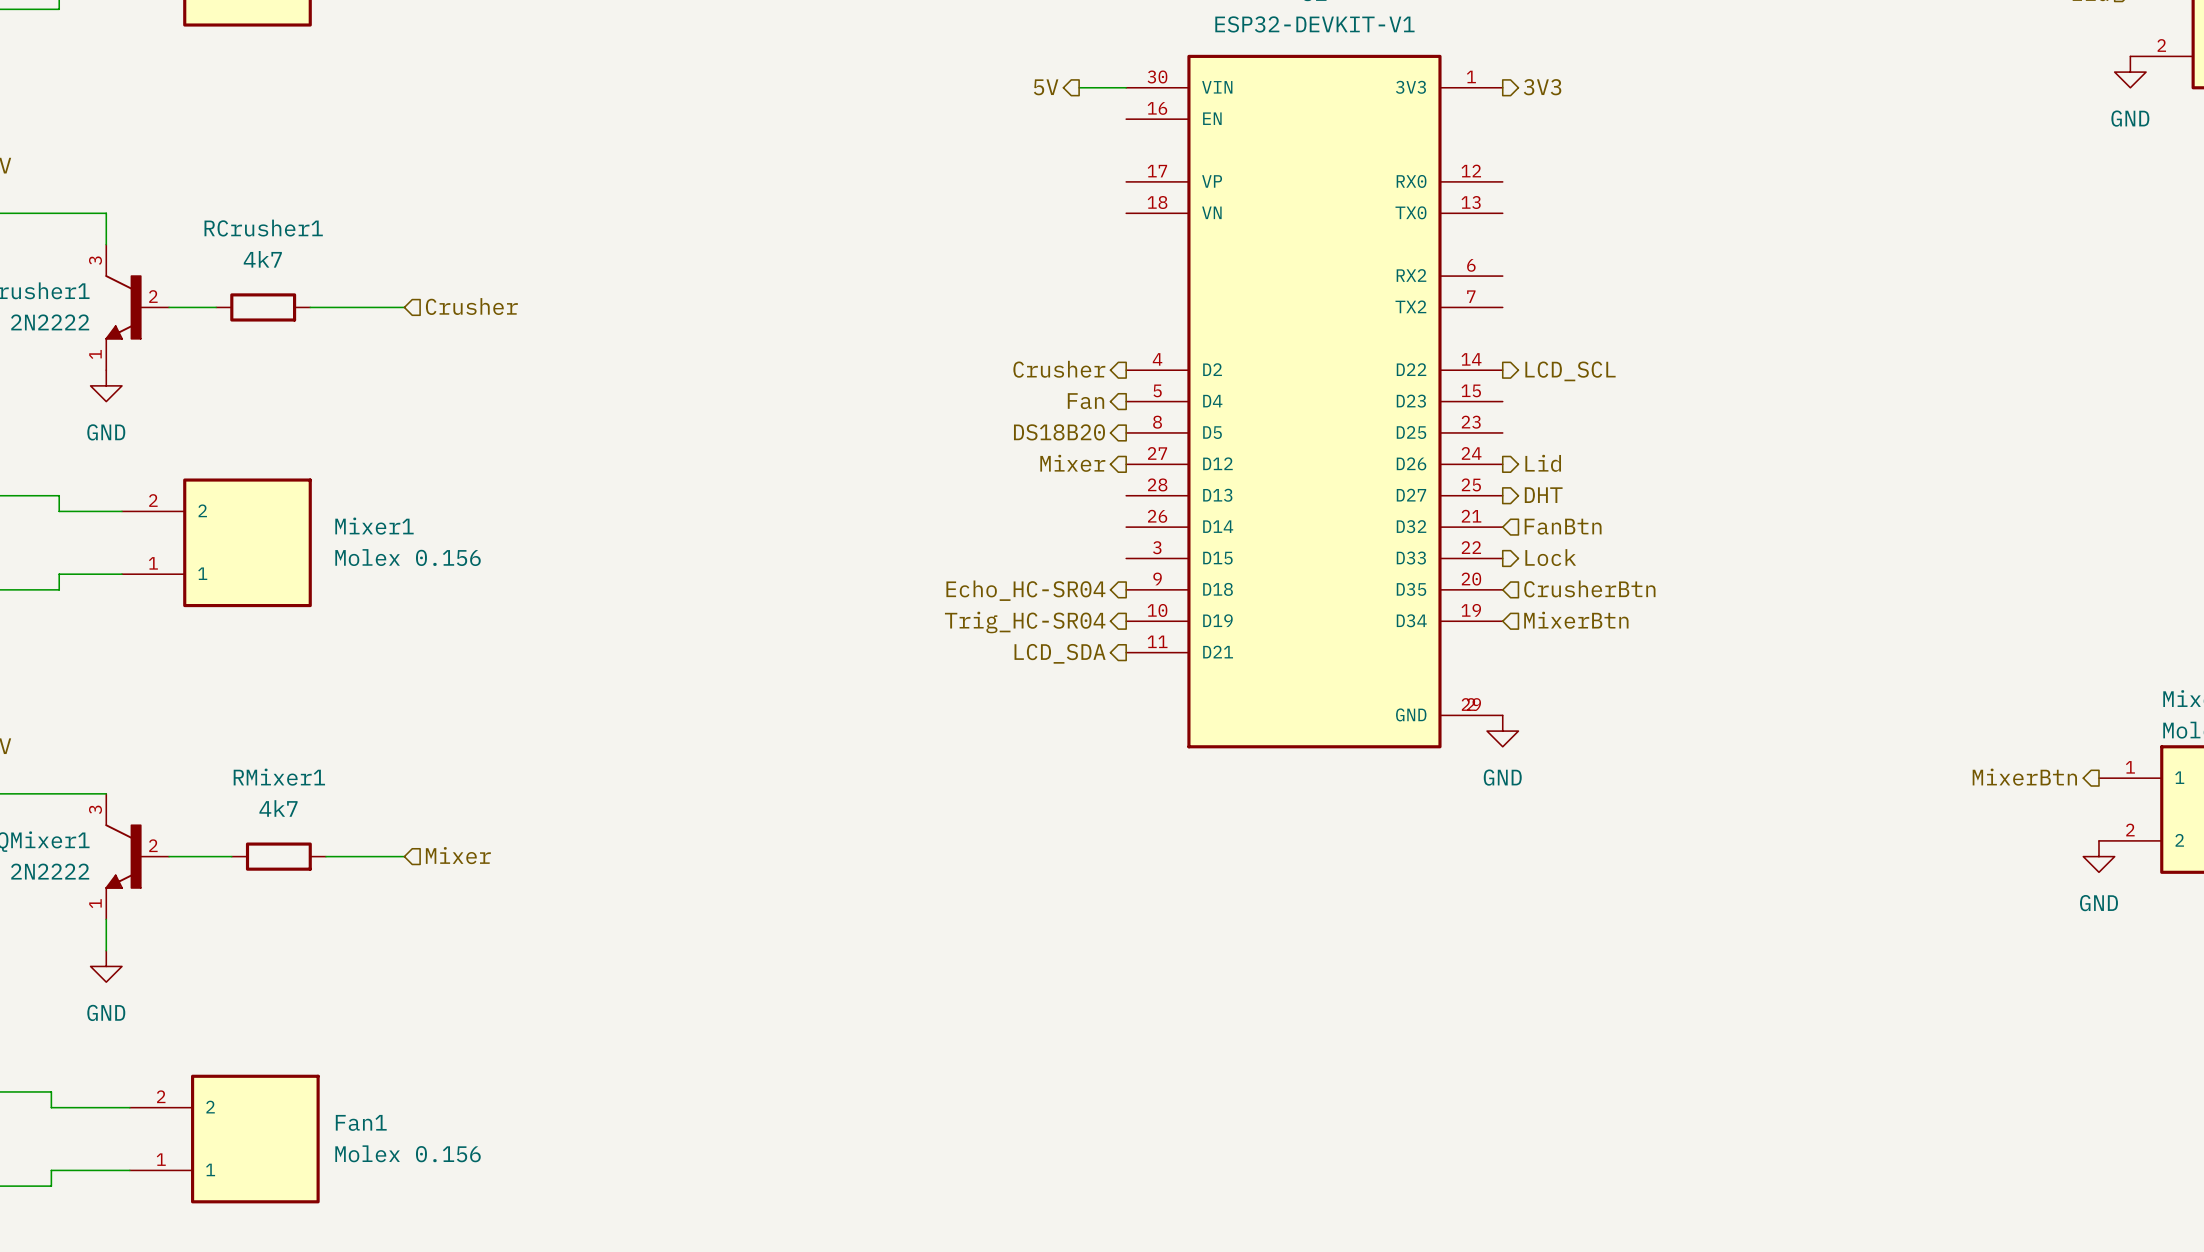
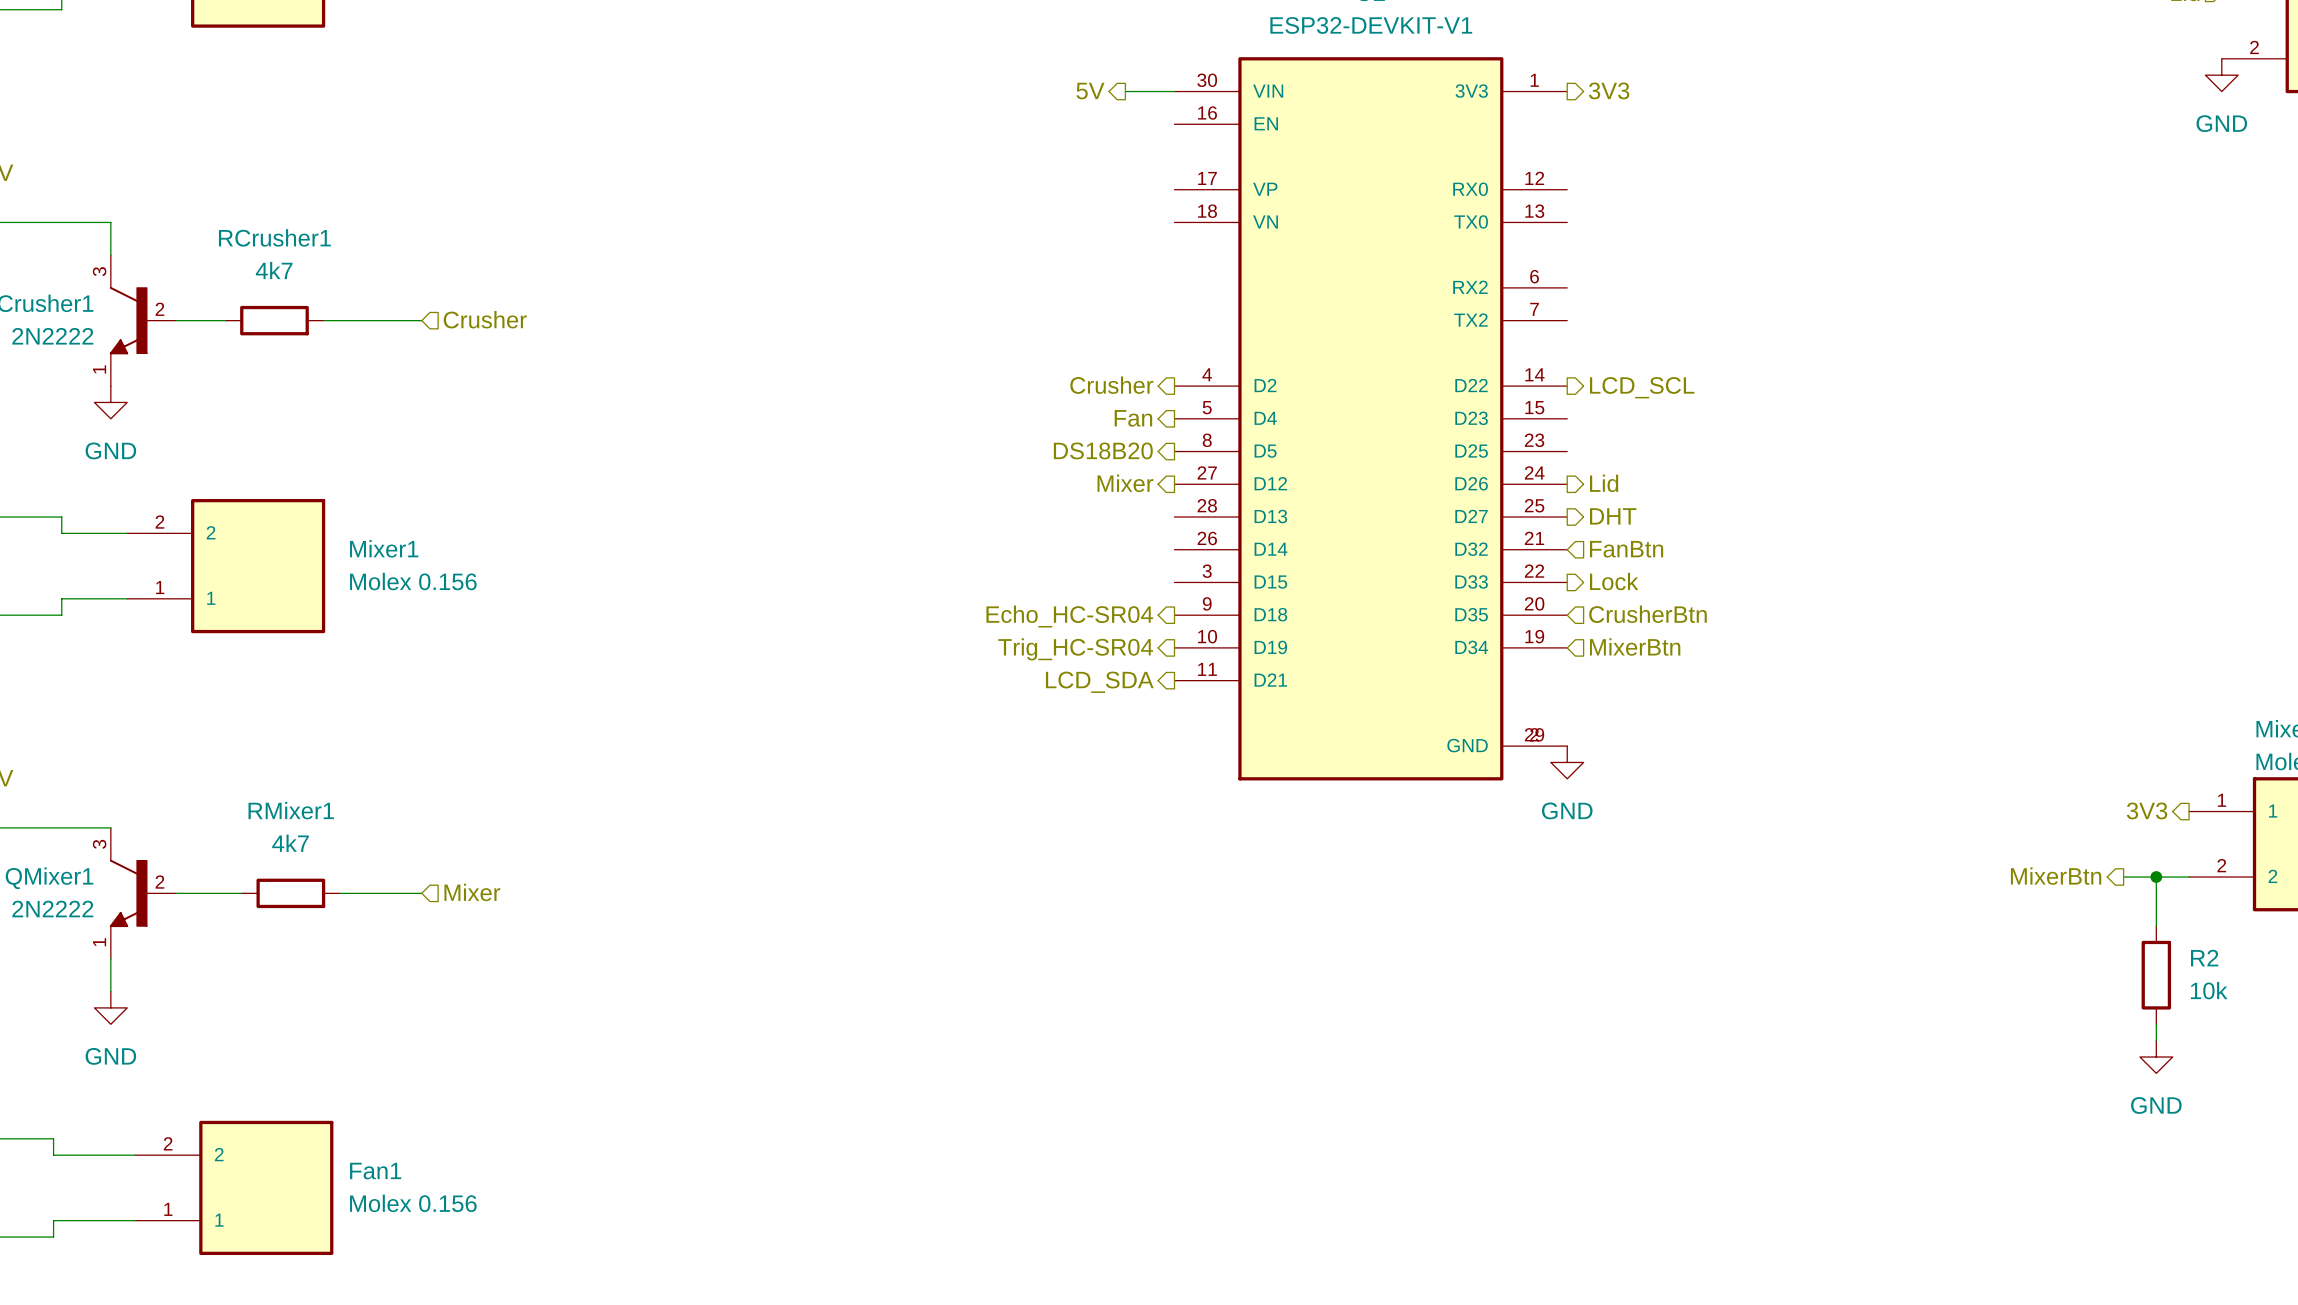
hierarchical label: MixerBtn (2024, 777) -> 3V3 (2147, 810)
hierarchical label: none -> MixerBtn (2056, 876)
wire: none -> (2123, 877) (2189, 877)
wire: none -> (2156, 877) (2156, 926)
junction: none -> (2156, 877)
power symbol position: GND (2098, 856) -> GND (2156, 1057)
R2: none -> 10k (2156, 975)
wire: none -> (2156, 1024) (2156, 1040)

